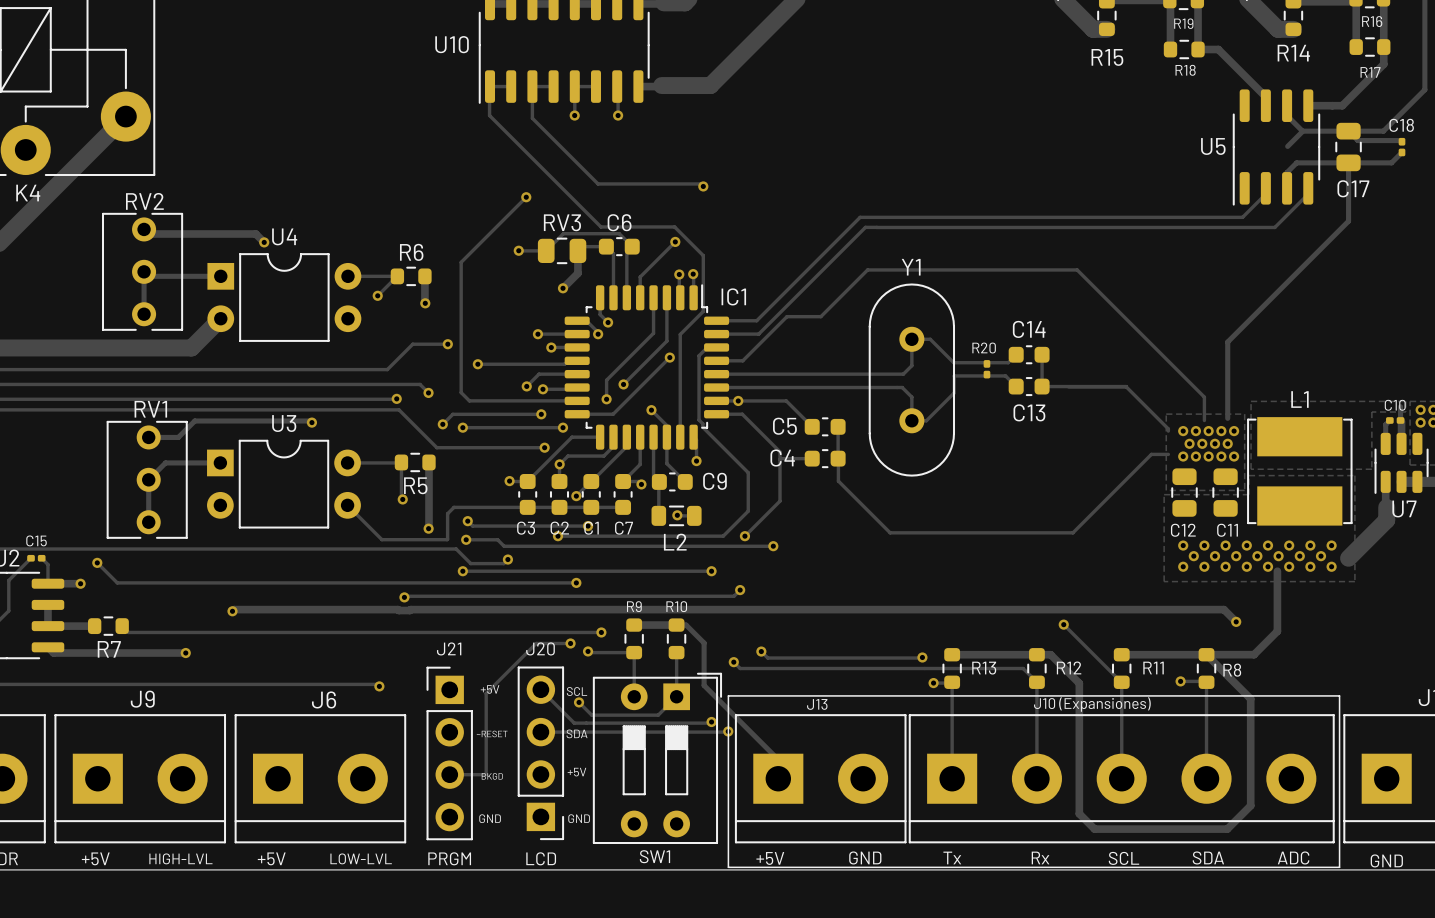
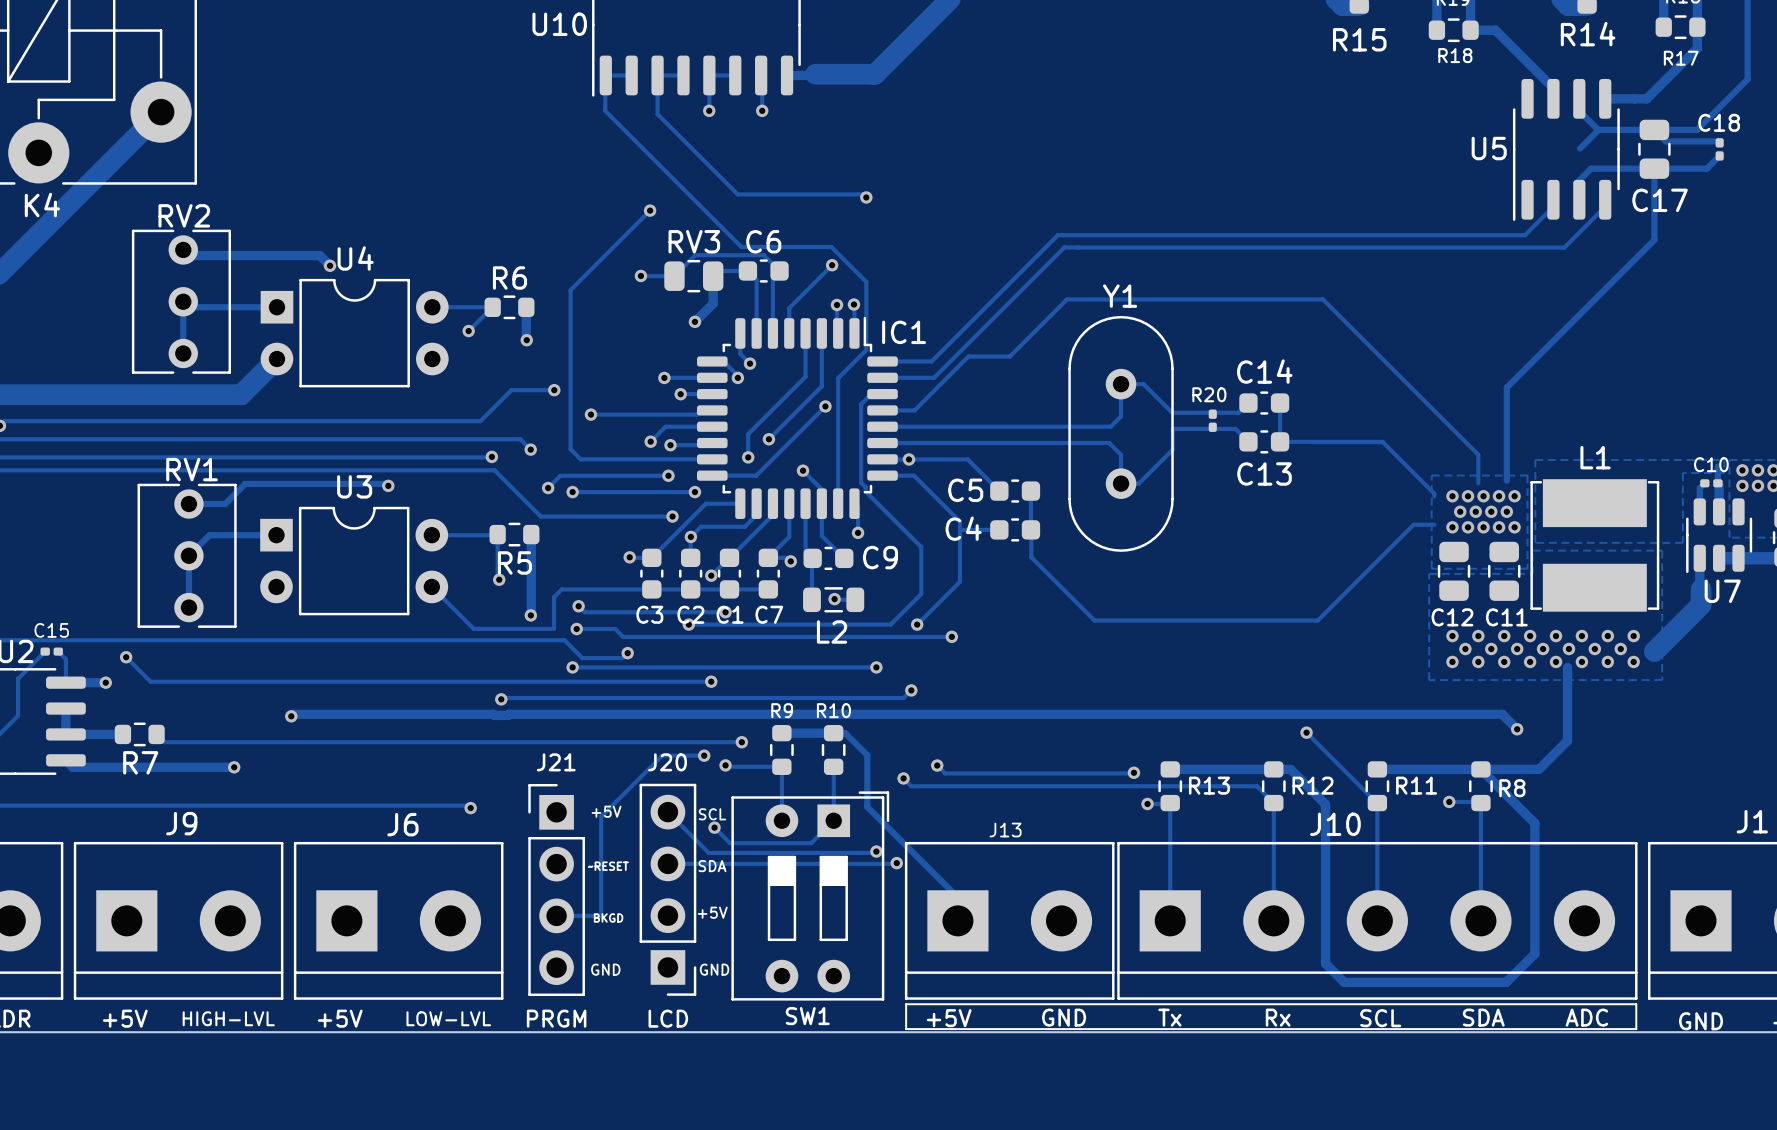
J10 (Expansiones) name: J10 (Expansiones) (1092, 704) -> J10 (1335, 824)
line: (735, 867) (728, 867) (728, 695) (1339, 695) (1339, 867) (1333, 867) -> (906, 1029) (906, 1004) (1636, 1004) (1636, 1029)

